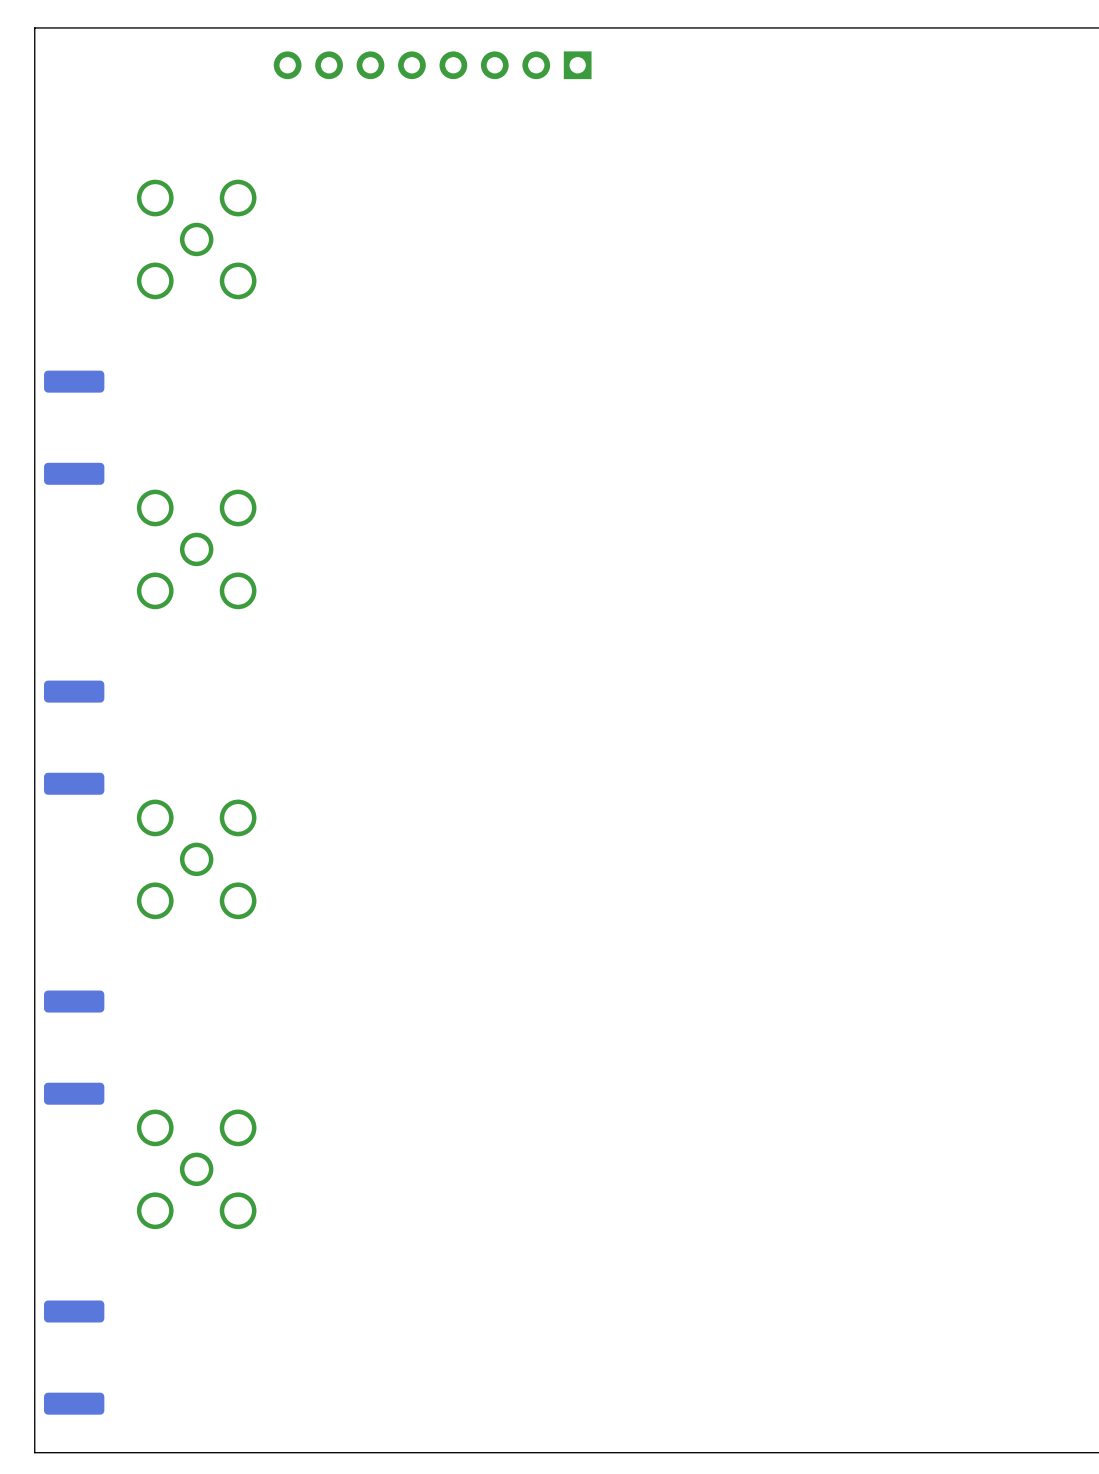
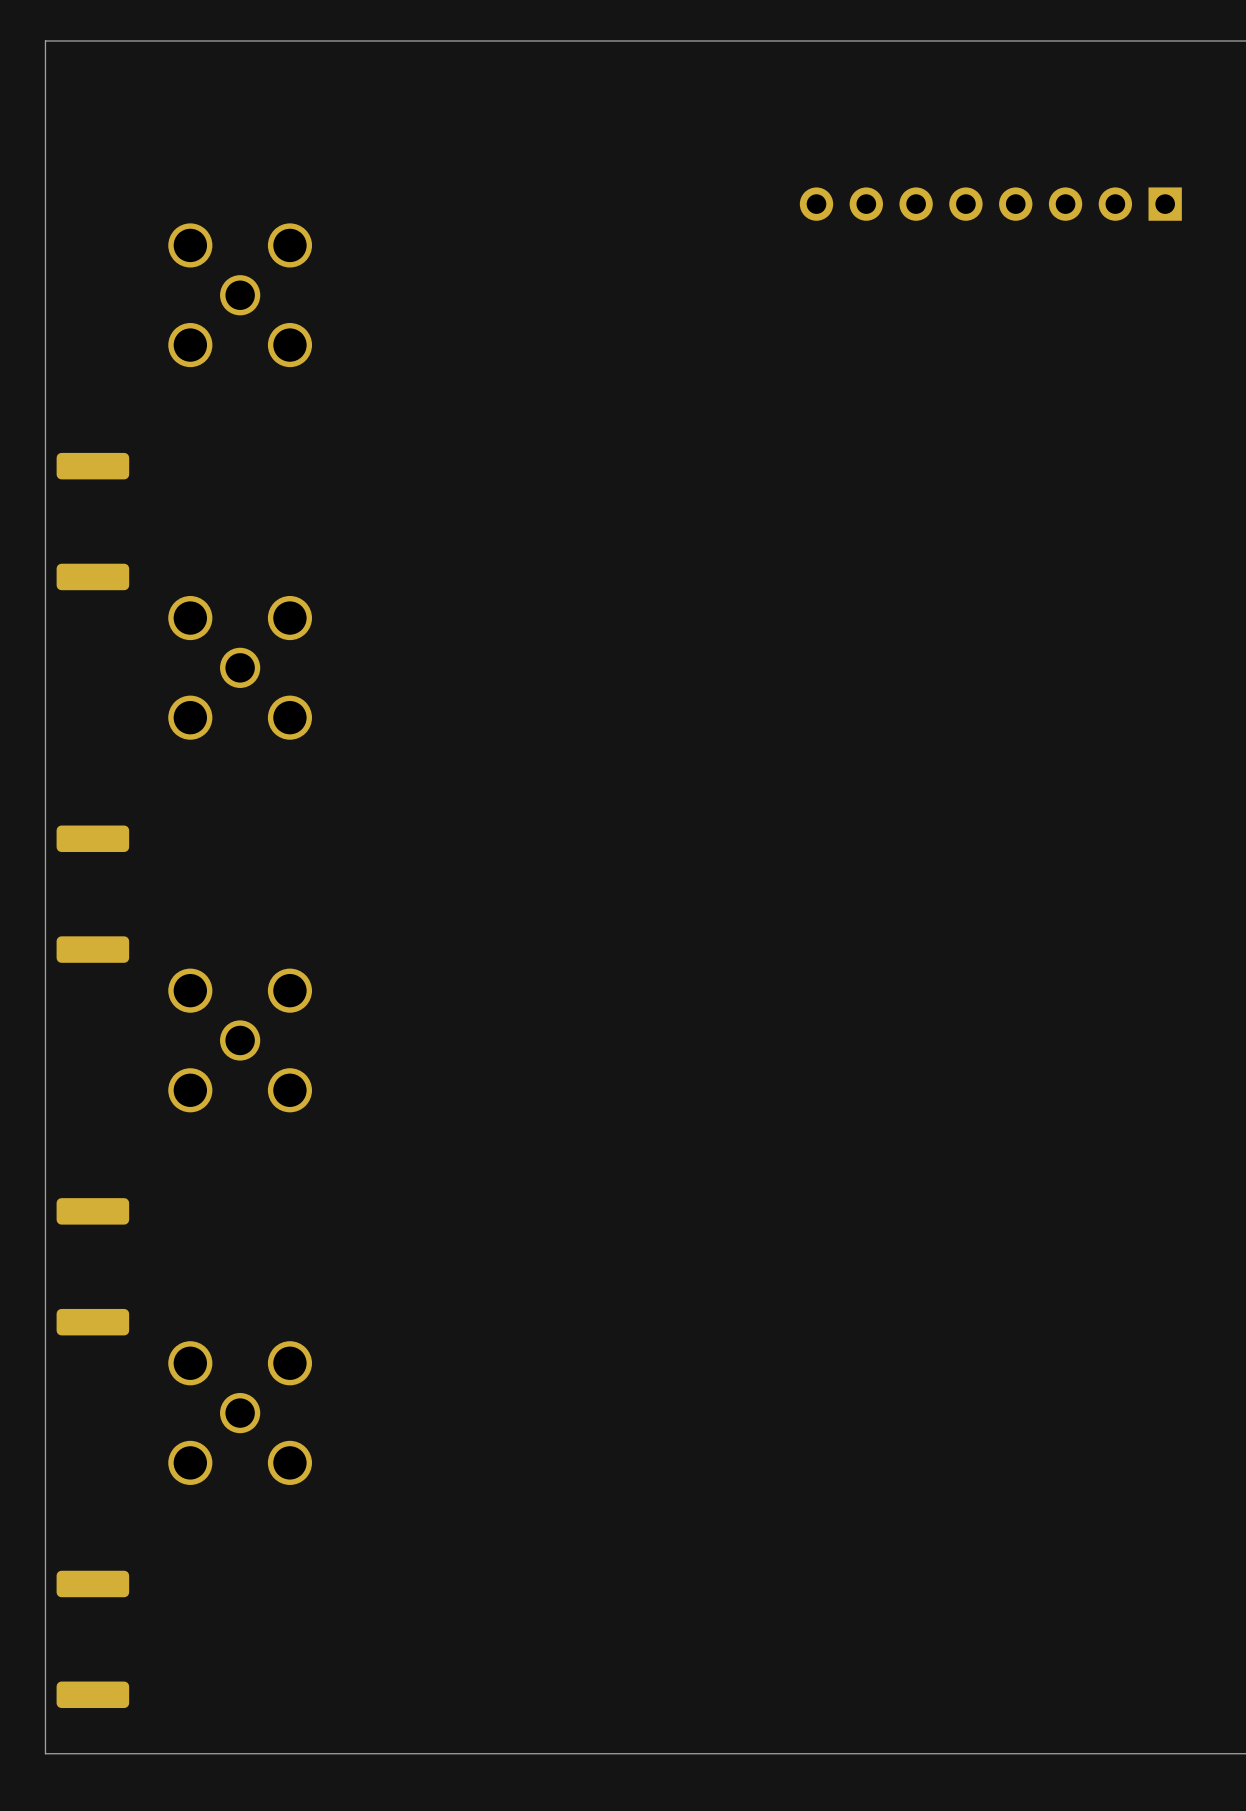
part position: (432, 65) -> (990, 204)

